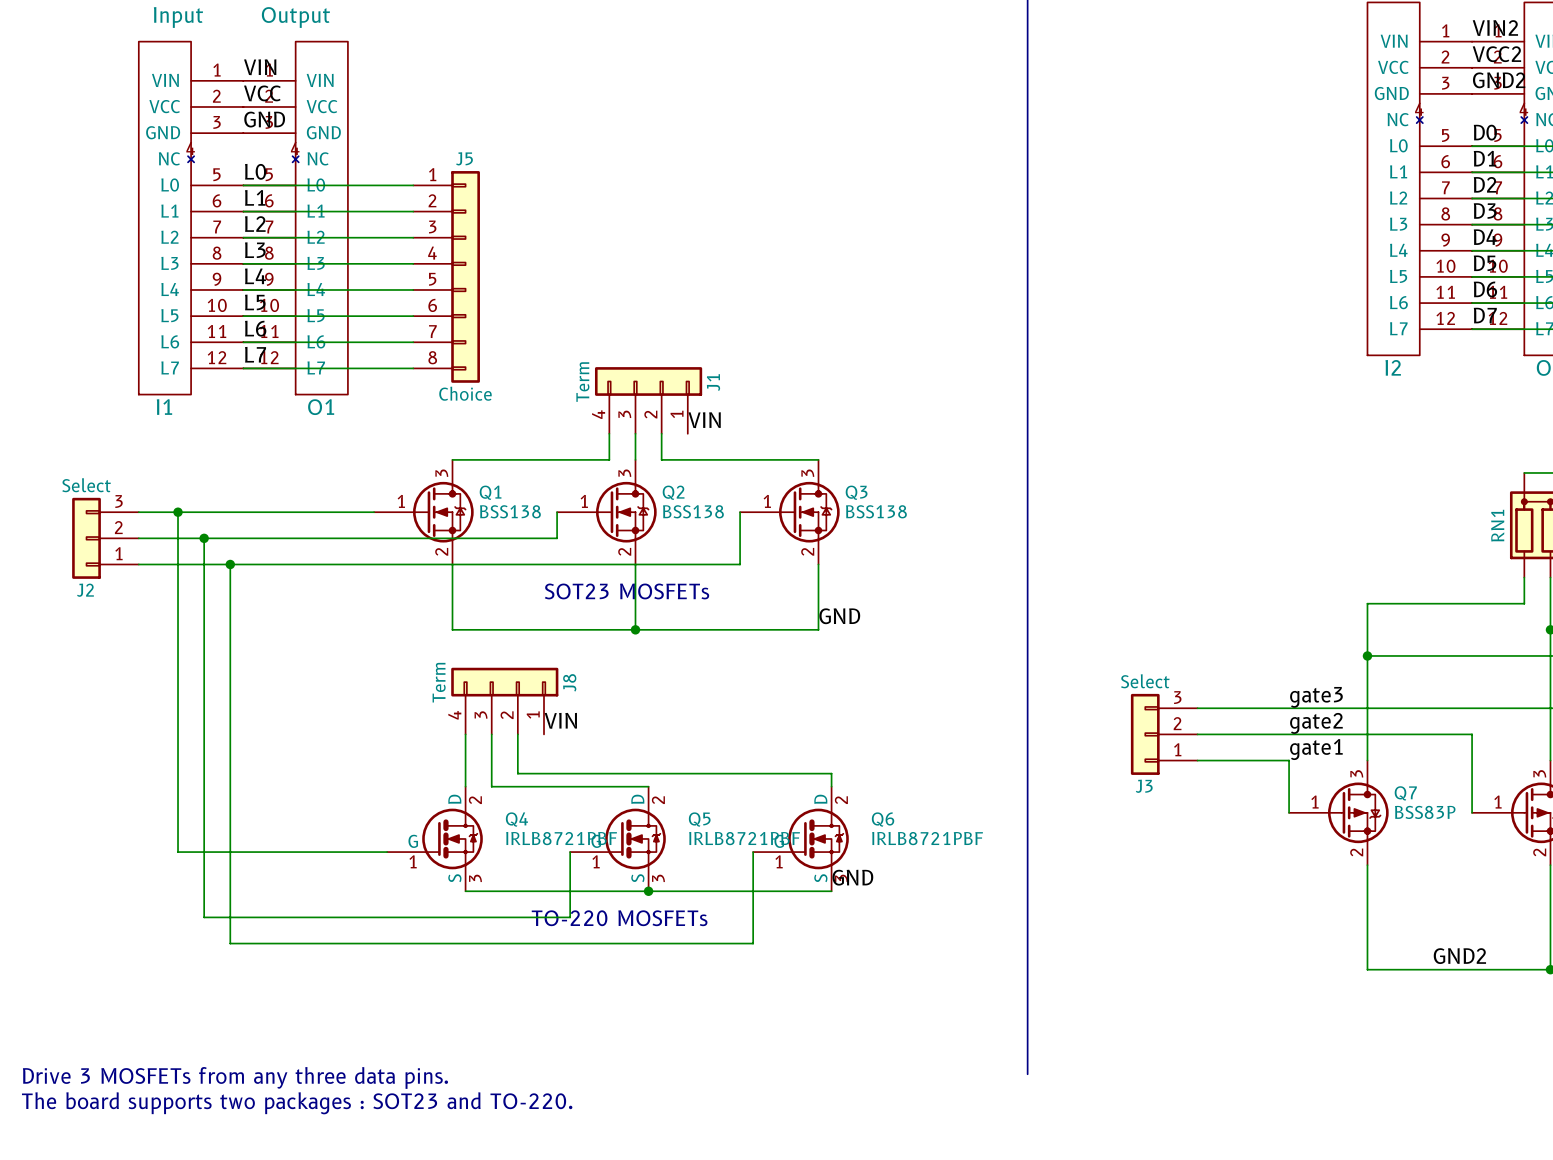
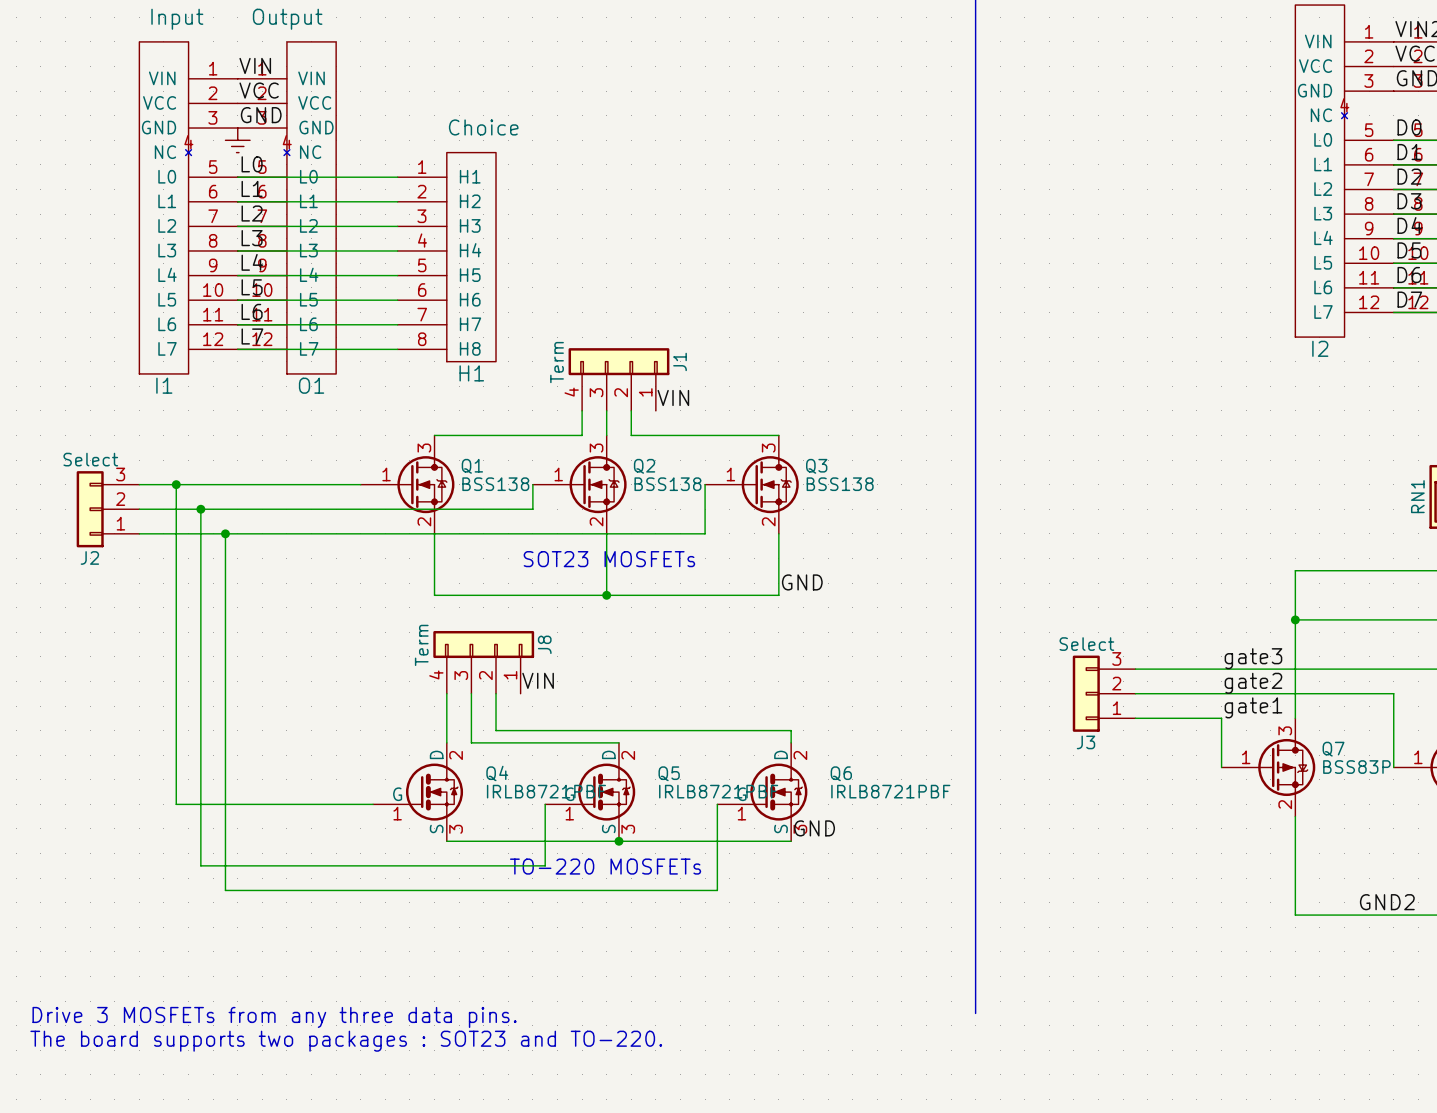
power symbol: none -> (237, 140)
H1: none -> Choice (446, 257)
J5: Choice (446, 276) -> none

